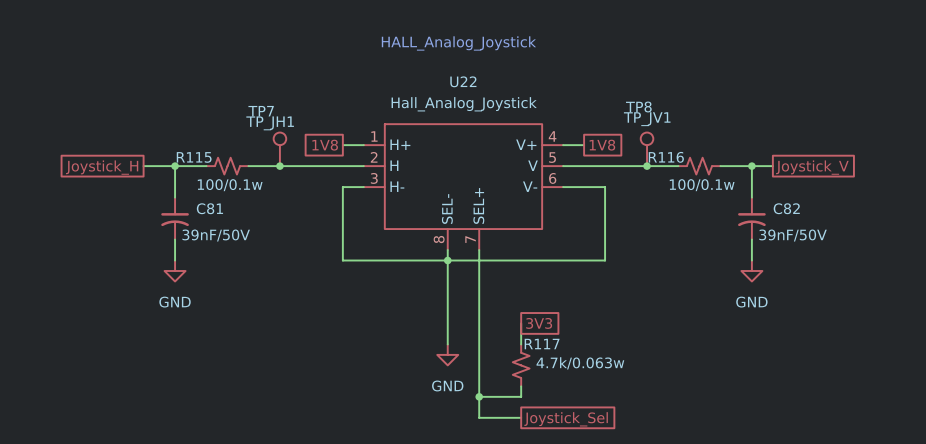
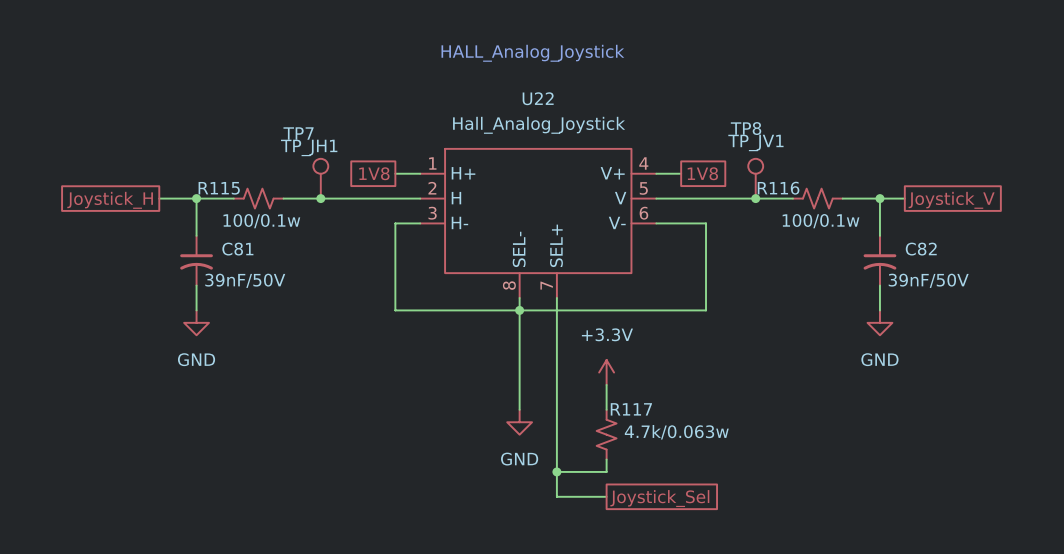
power symbol: none -> +3.3V (606, 372)
global label: 3V3 (539, 323) -> none

